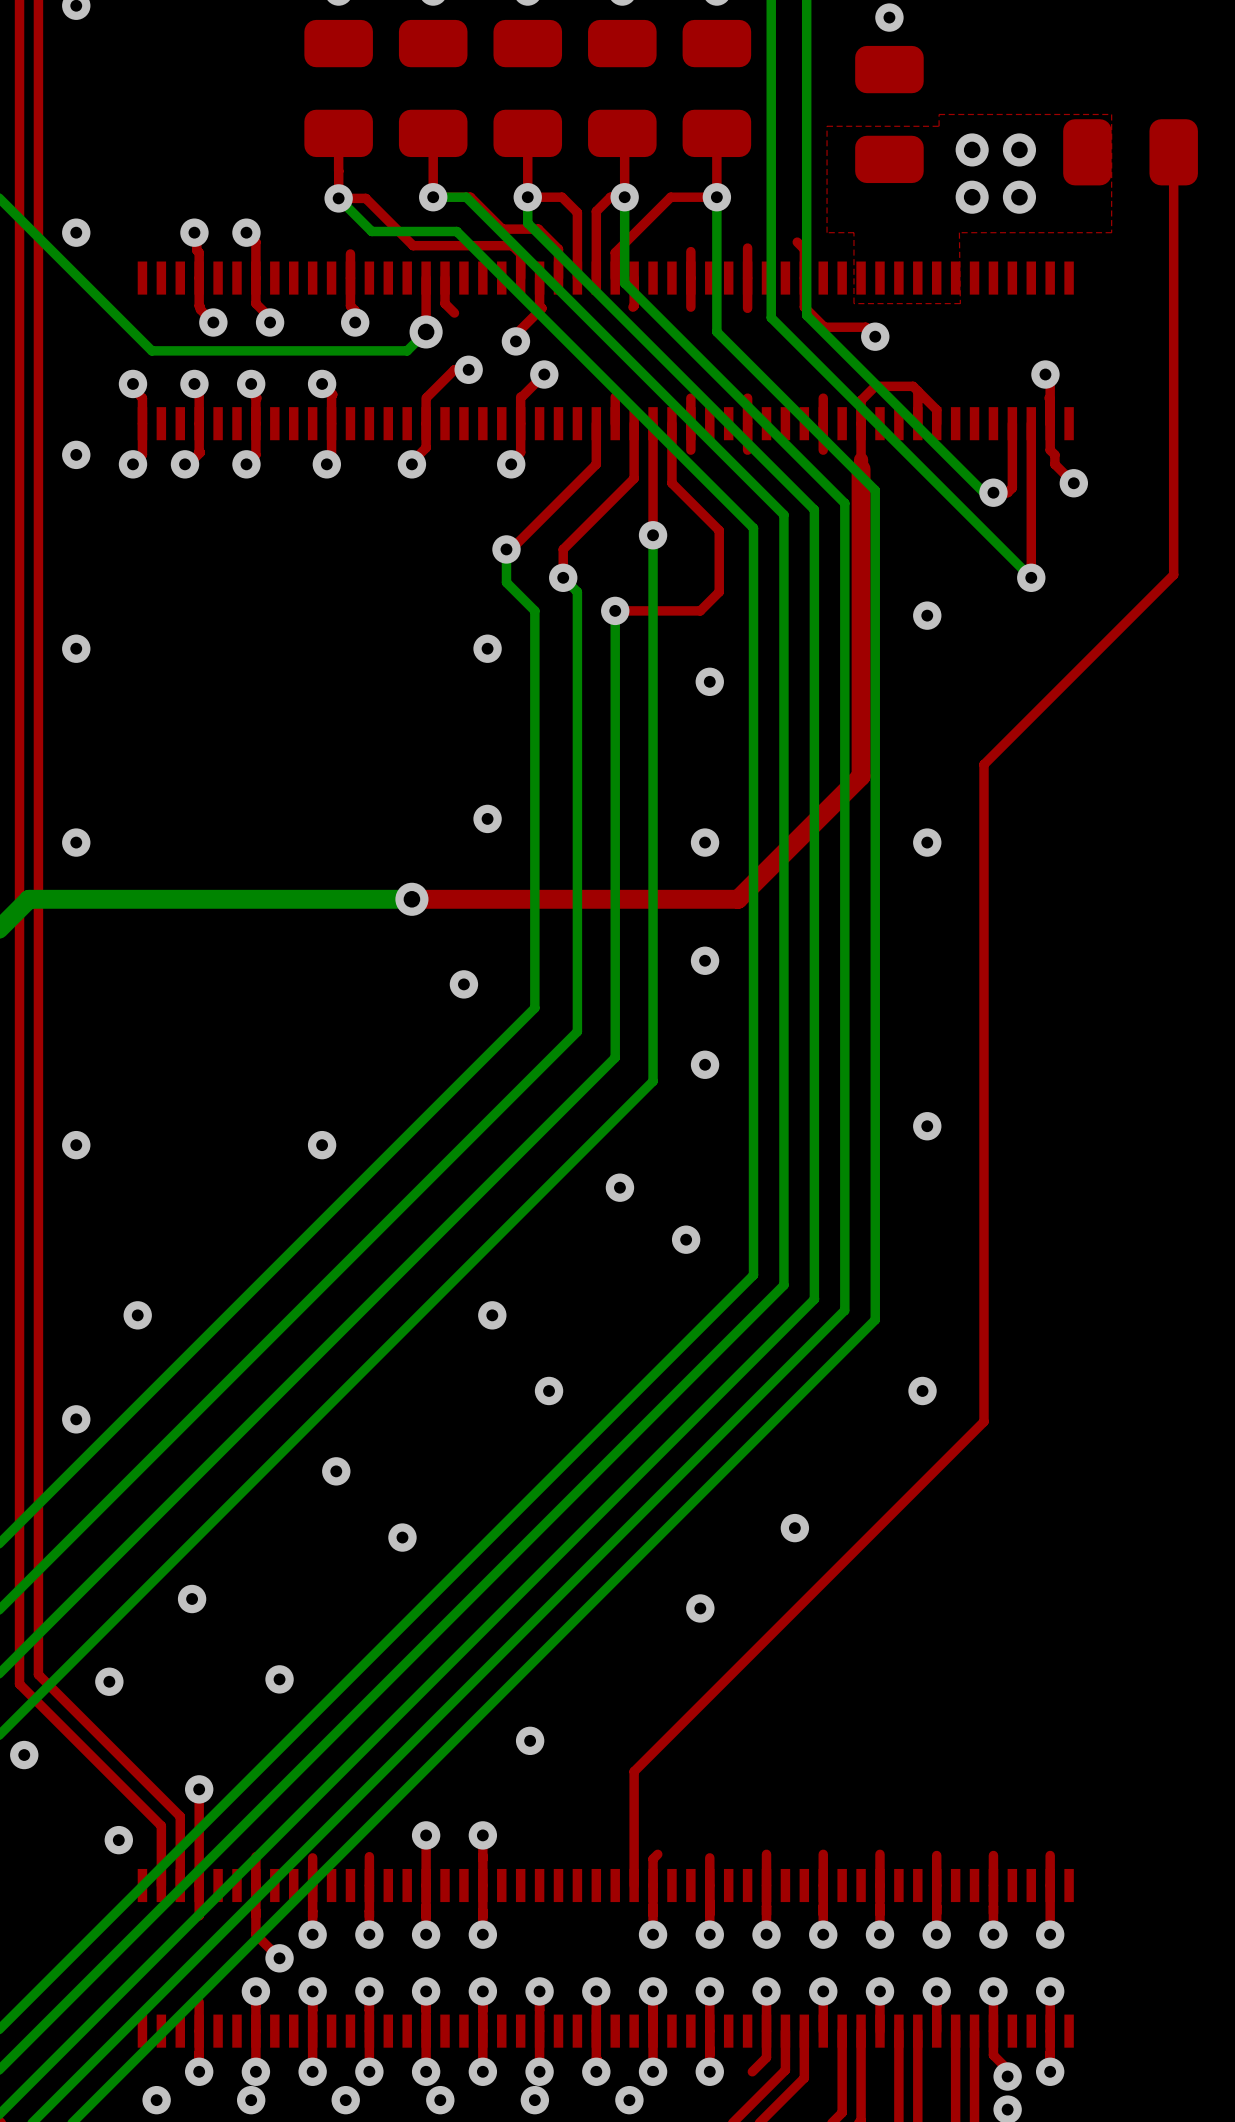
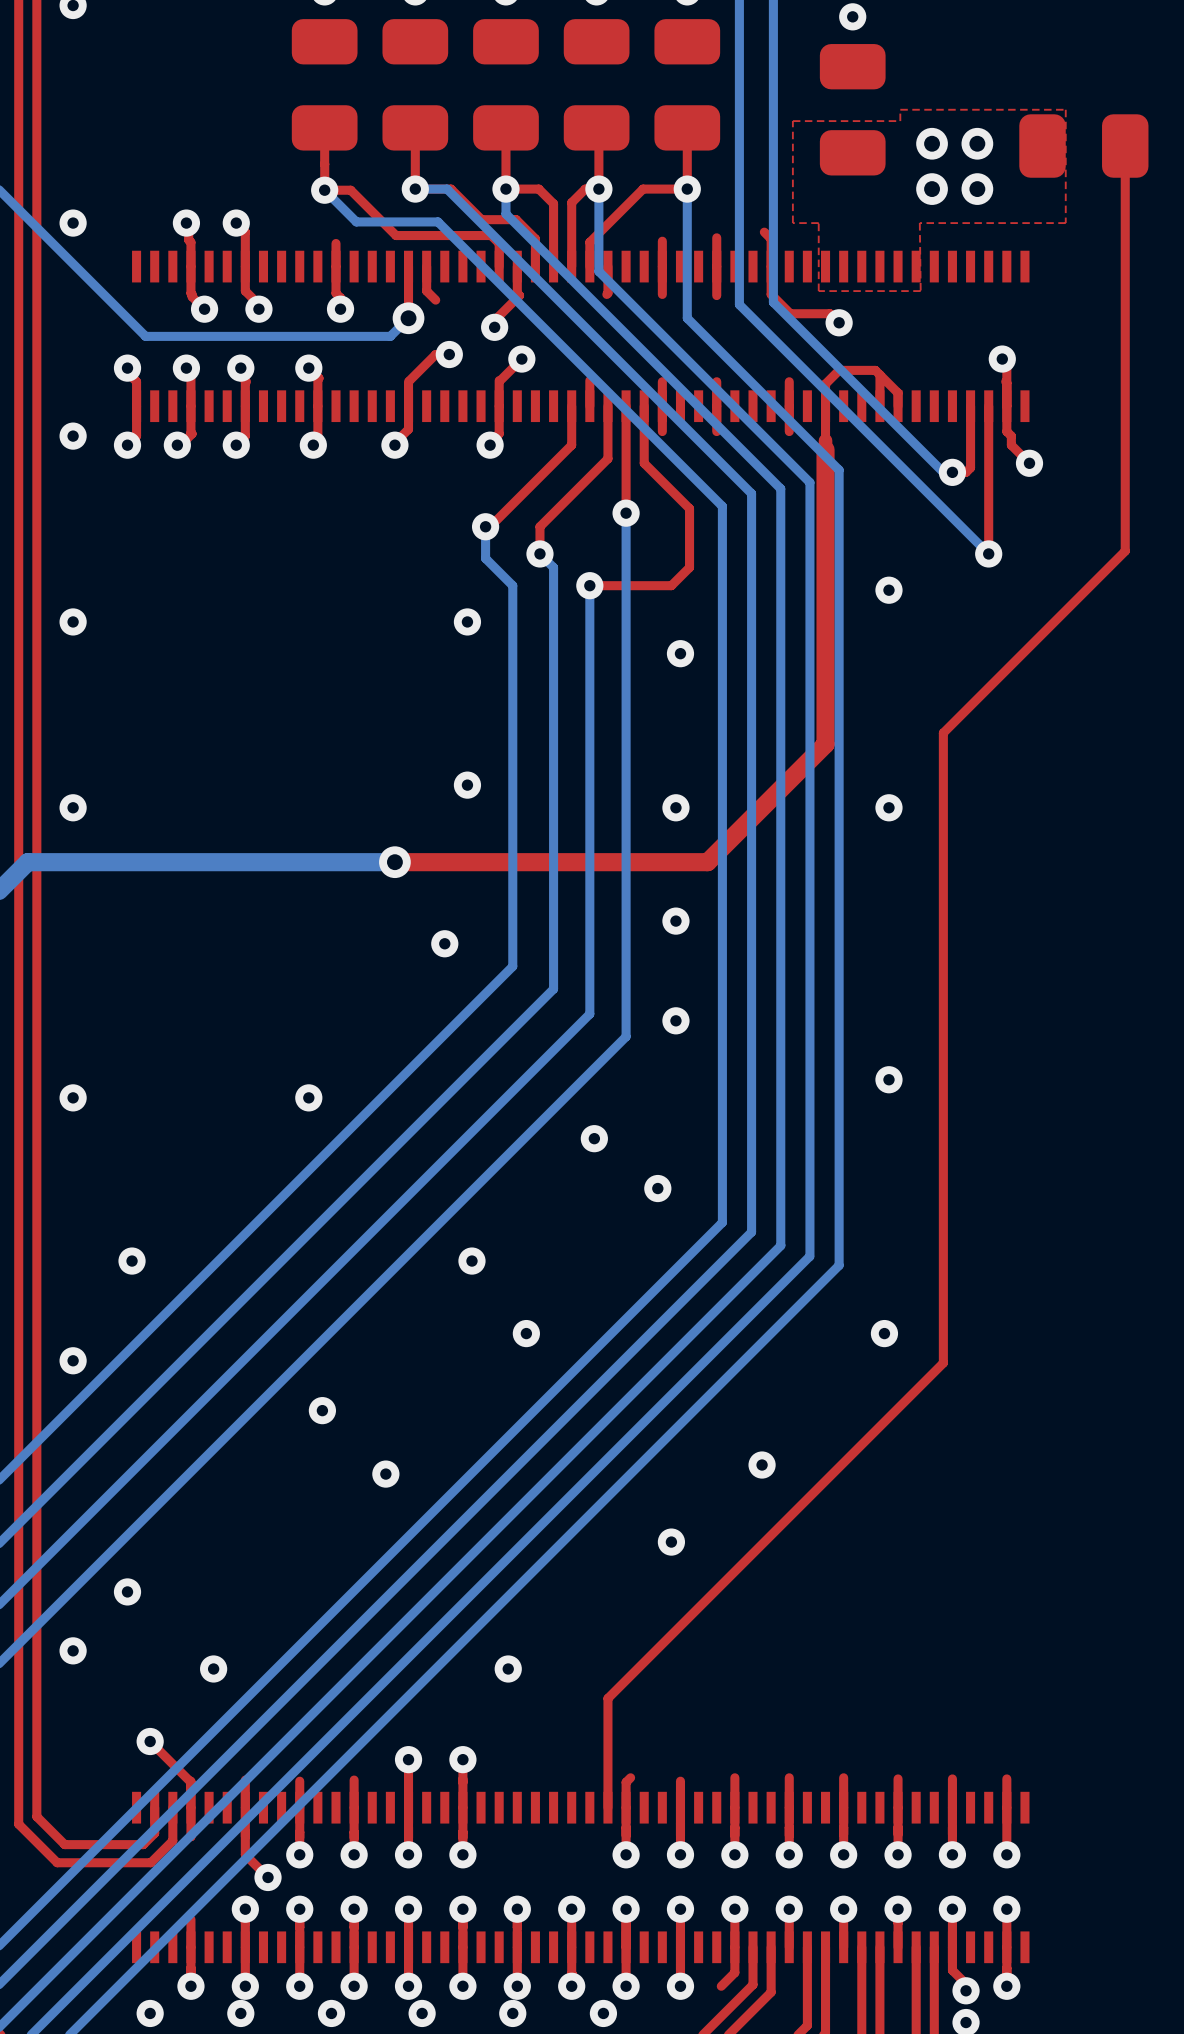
via: (192, 1599) -> none
top track: (38, 1674) (180, 1816) (180, 1885) -> (36, 1605) (36, 1816) (64, 1844) (143, 1844) (154, 1833) (154, 1807)
via: (279, 1679) -> none
via position: (109, 1681) -> (127, 1591)
top track: (19, 1684) (161, 1825) (161, 1885) -> (18, 1614) (18, 1824) (57, 1862) (150, 1862) (172, 1840) (172, 1807)
via: none -> (73, 1650)
via: none -> (213, 1668)
via: (24, 1755) -> none
top track: (199, 1789) (199, 1857) -> (150, 1741) (190, 1782)
via: (199, 1789) -> none
via: none -> (150, 1741)
via: (118, 1840) -> none

